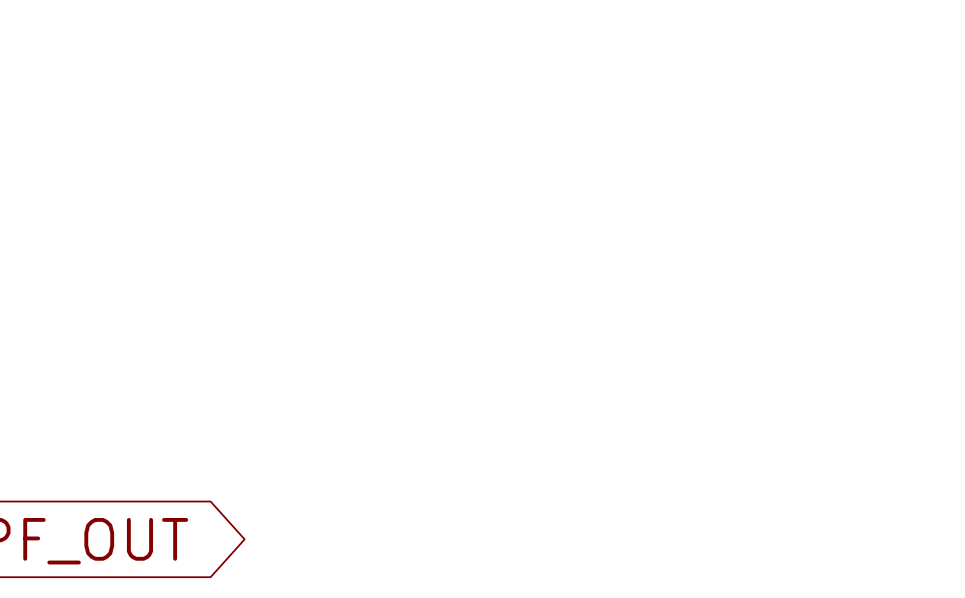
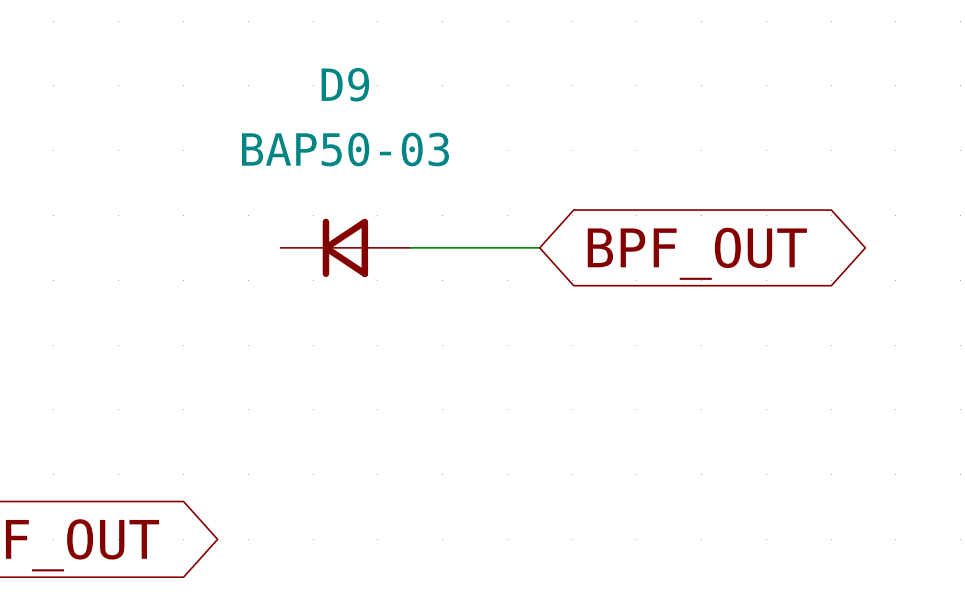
D9: none -> BAP50-03 (345, 247)
wire: none -> (410, 247) (539, 247)
global label: none -> BPF_OUT (697, 253)

